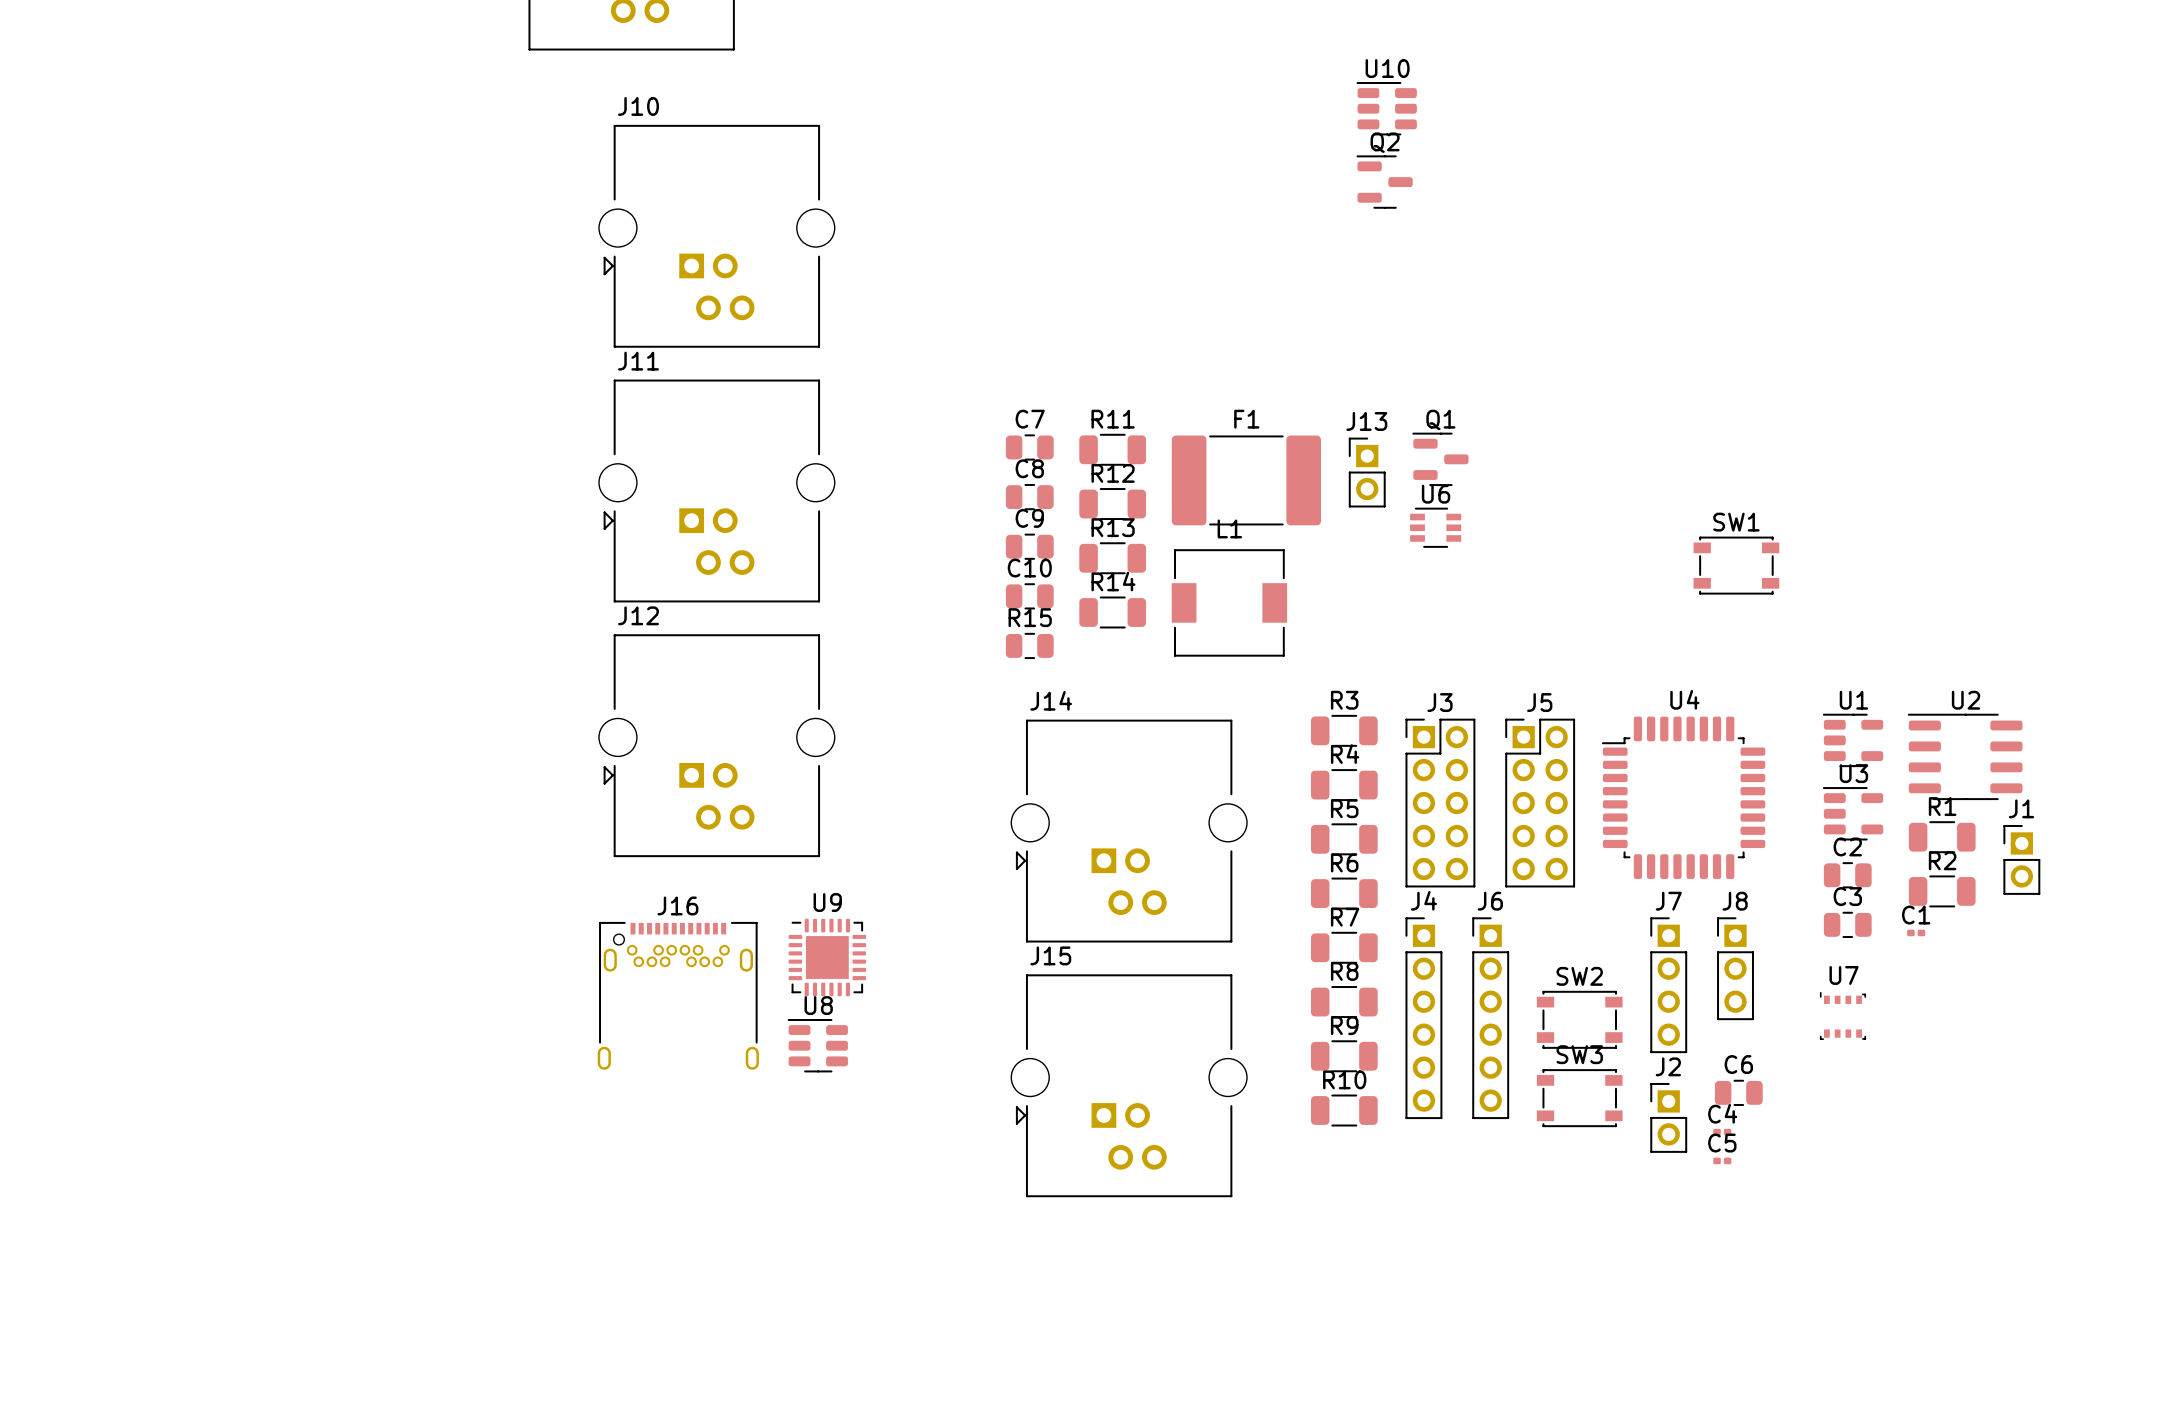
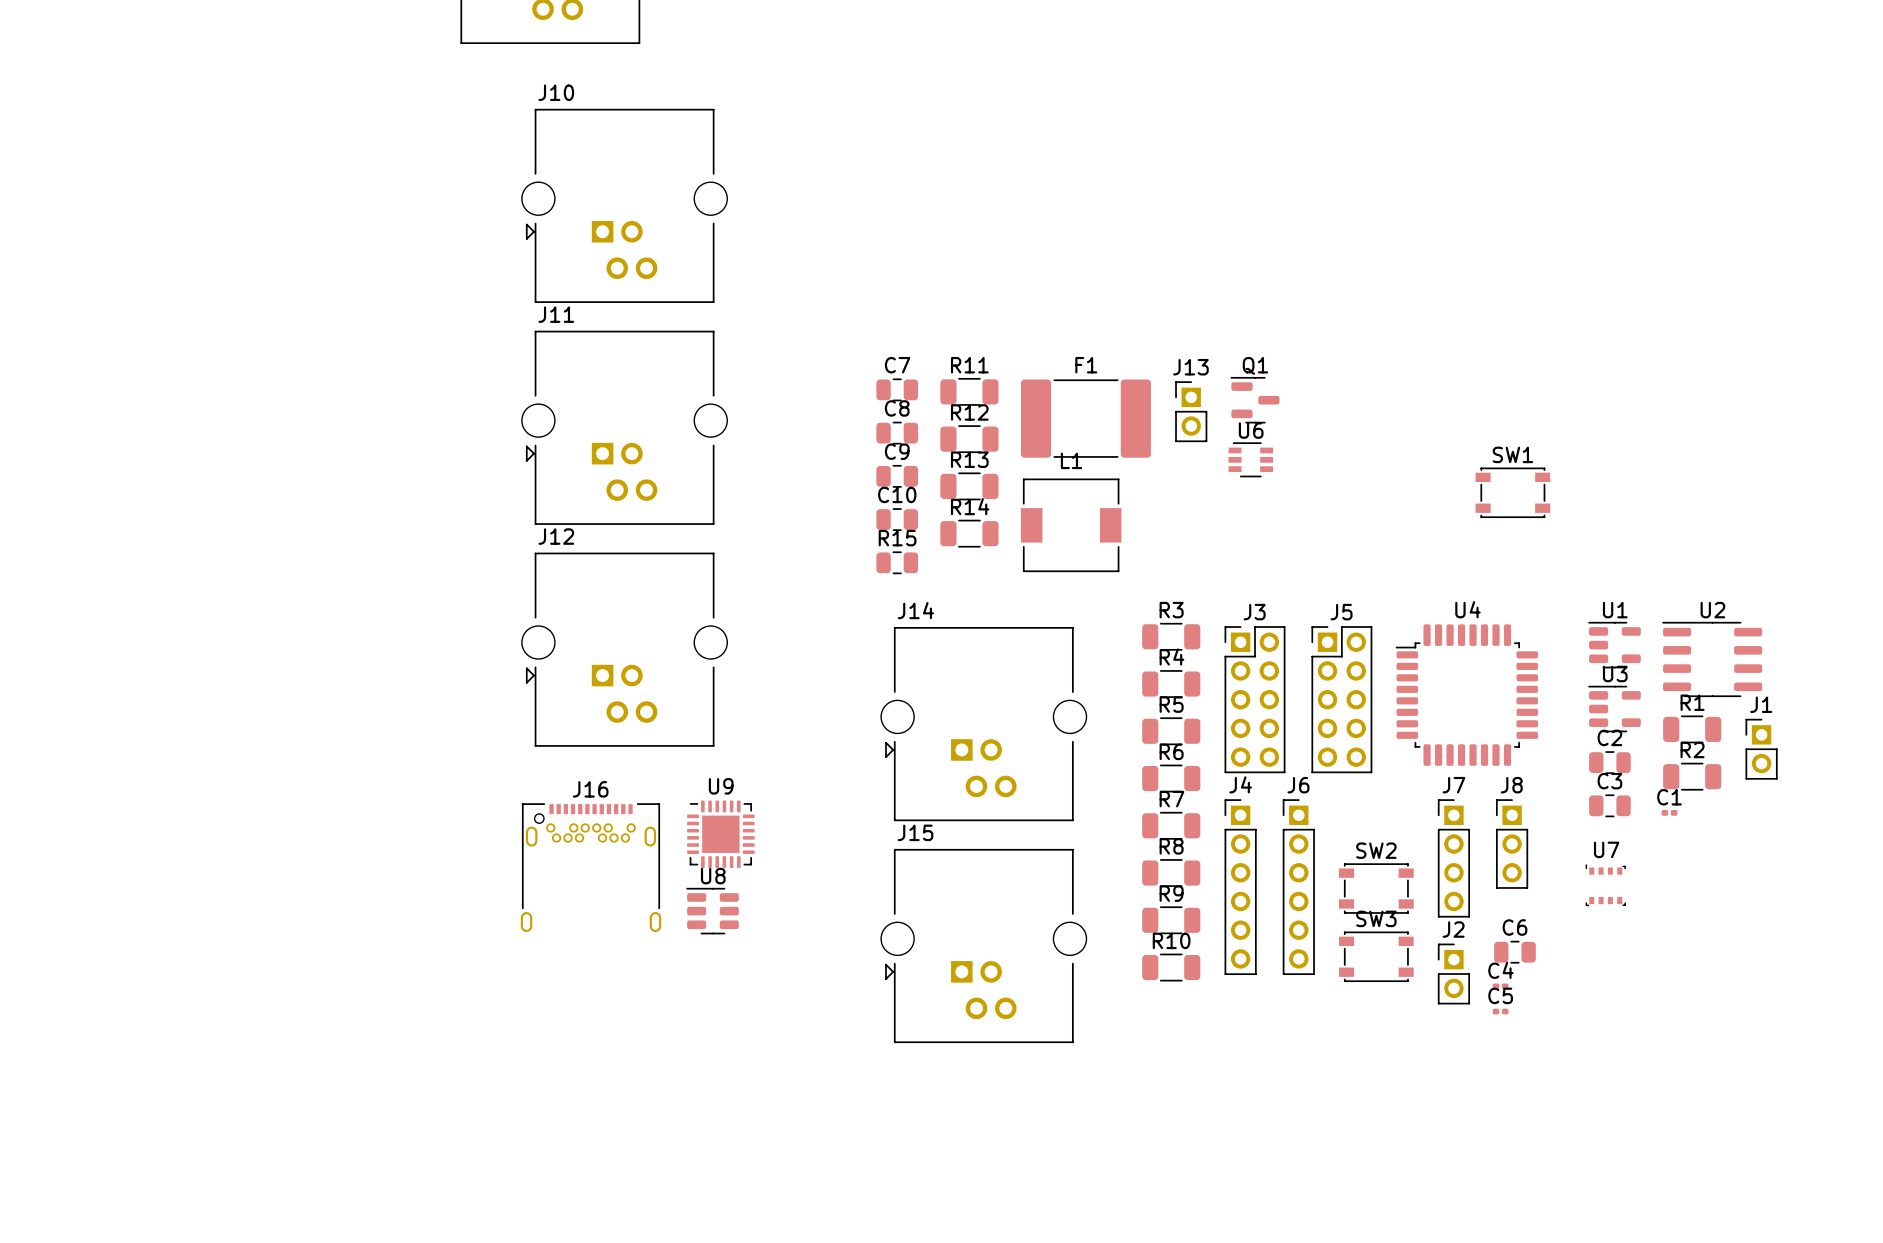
U10: (1386, 108) -> none
Q2: (1384, 182) -> none

